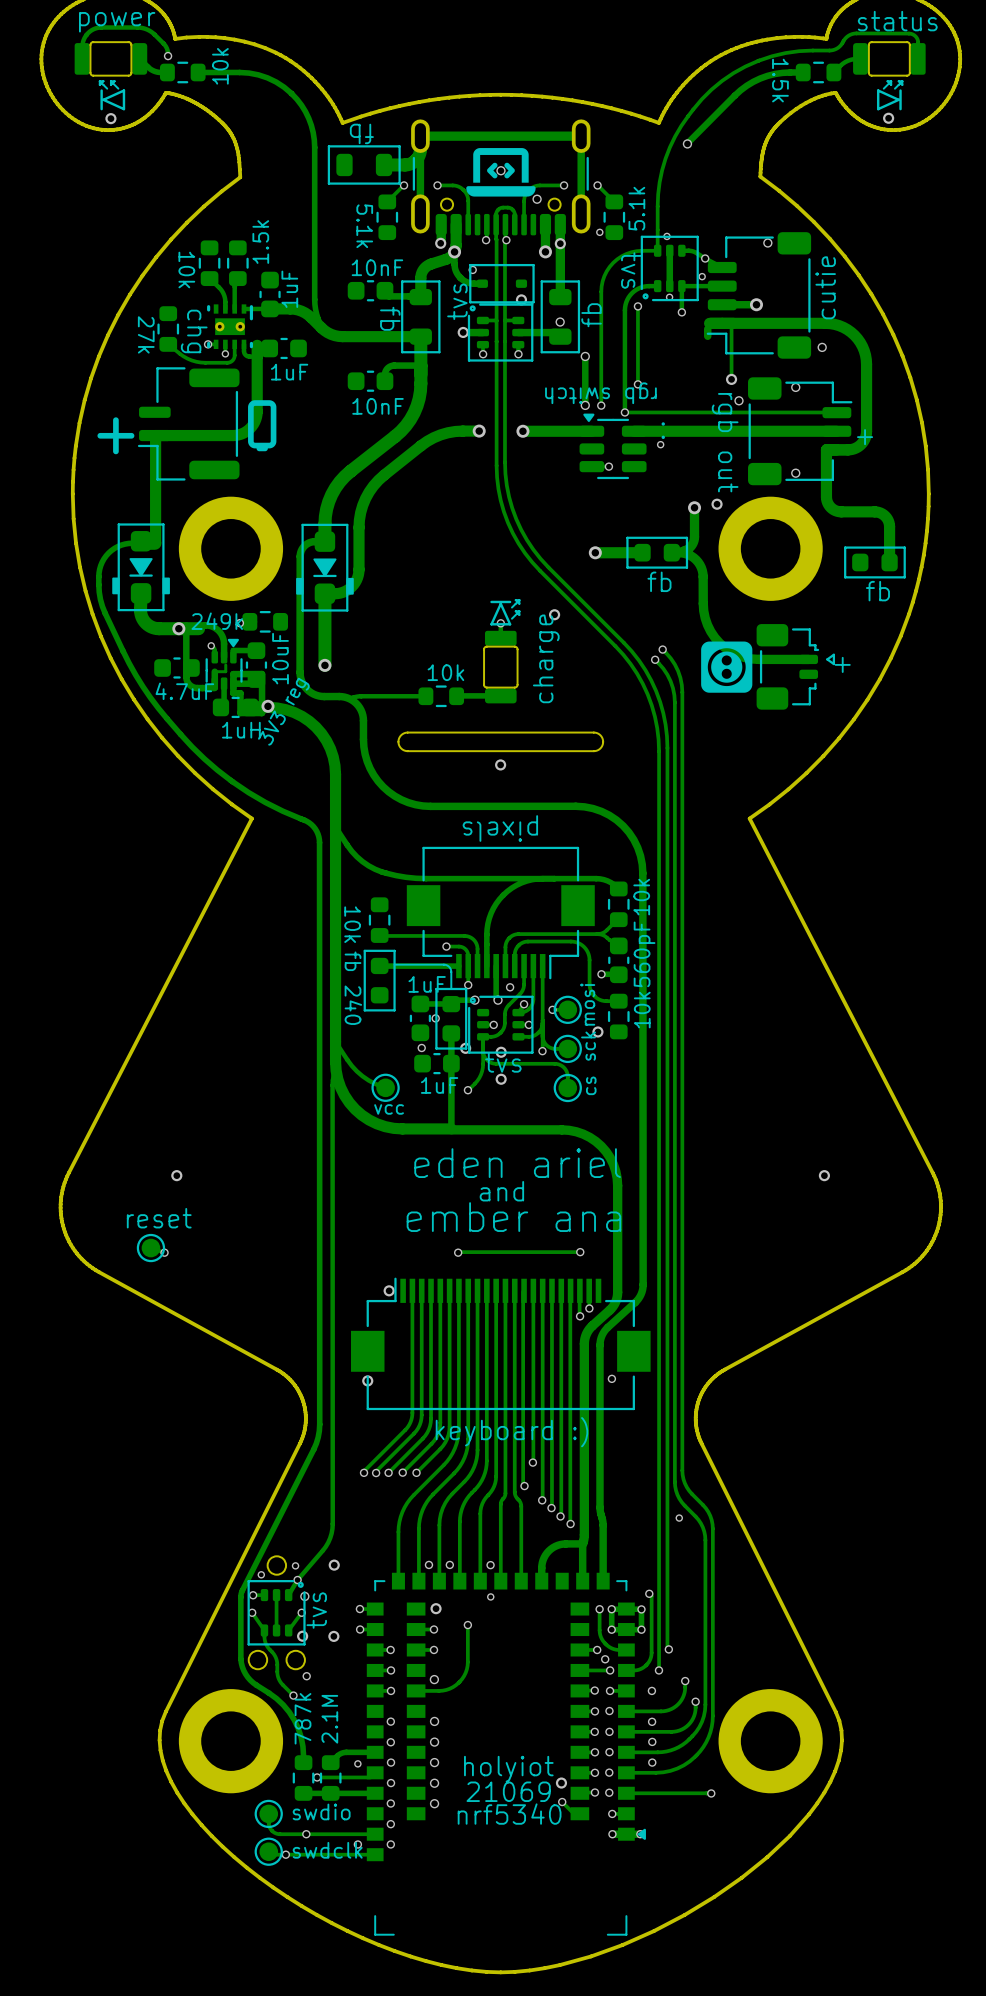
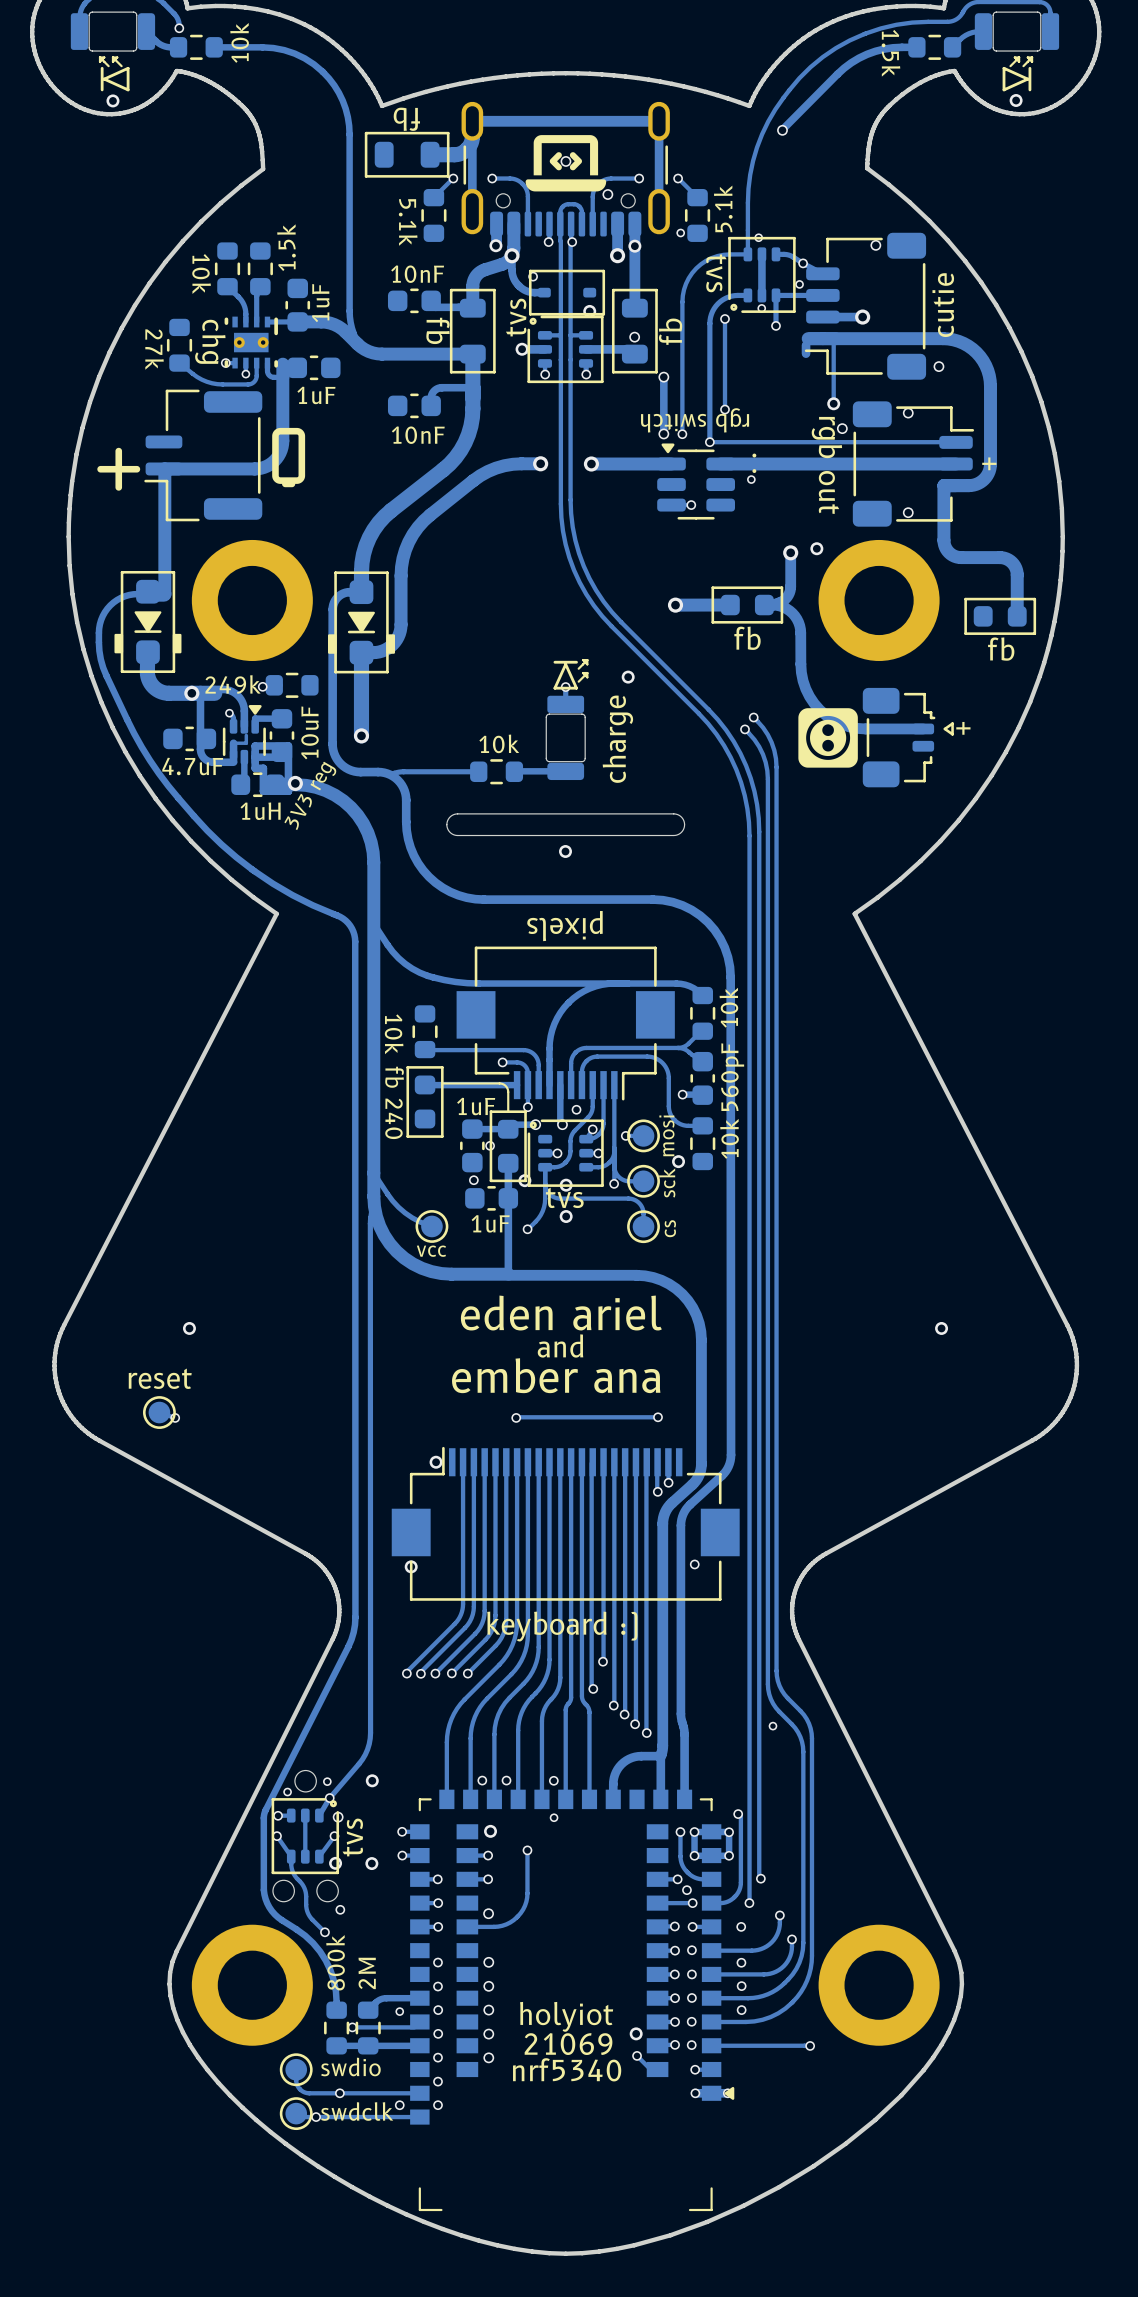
text: 787k (303, 1718) -> 800k (335, 1962)
text: 2.1M (329, 1719) -> 2M (367, 1973)

